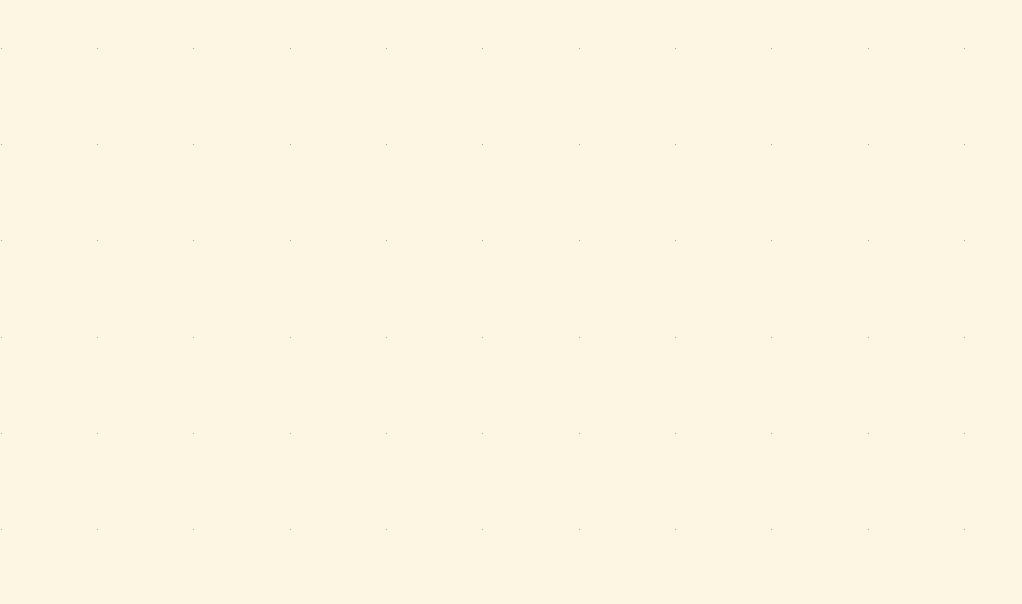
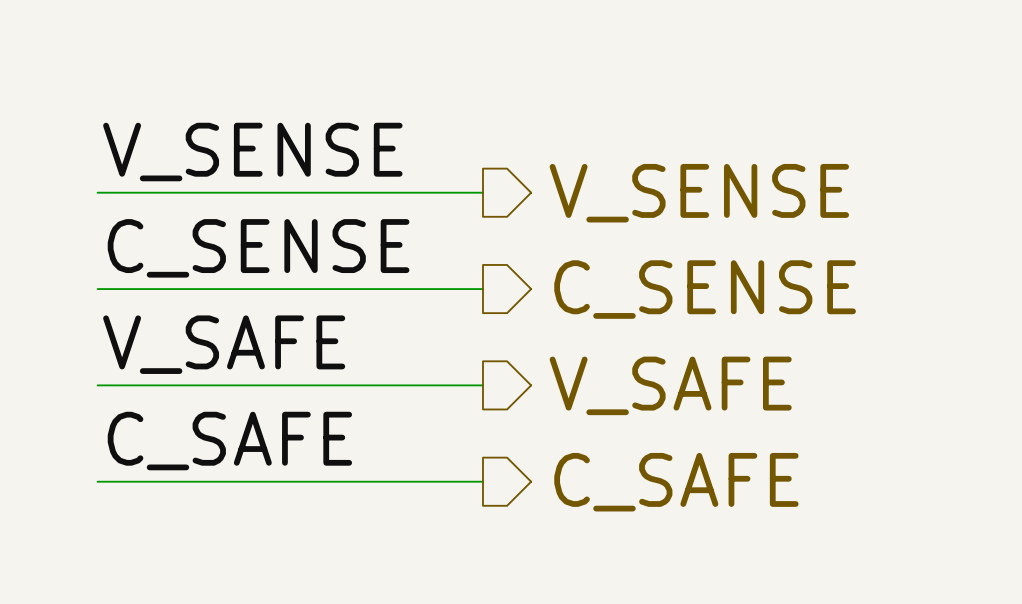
label: none -> V_SENSE (252, 152)
wire: none -> (97, 192) (482, 192)
hierarchical label: none -> V_SENSE (699, 193)
label: none -> C_SENSE (258, 248)
wire: none -> (97, 289) (482, 289)
hierarchical label: none -> C_SENSE (705, 289)
label: none -> V_SAFE (224, 344)
wire: none -> (97, 385) (482, 385)
hierarchical label: none -> V_SAFE (670, 385)
label: none -> C_SAFE (229, 441)
wire: none -> (97, 481) (482, 481)
hierarchical label: none -> C_SAFE (676, 482)

